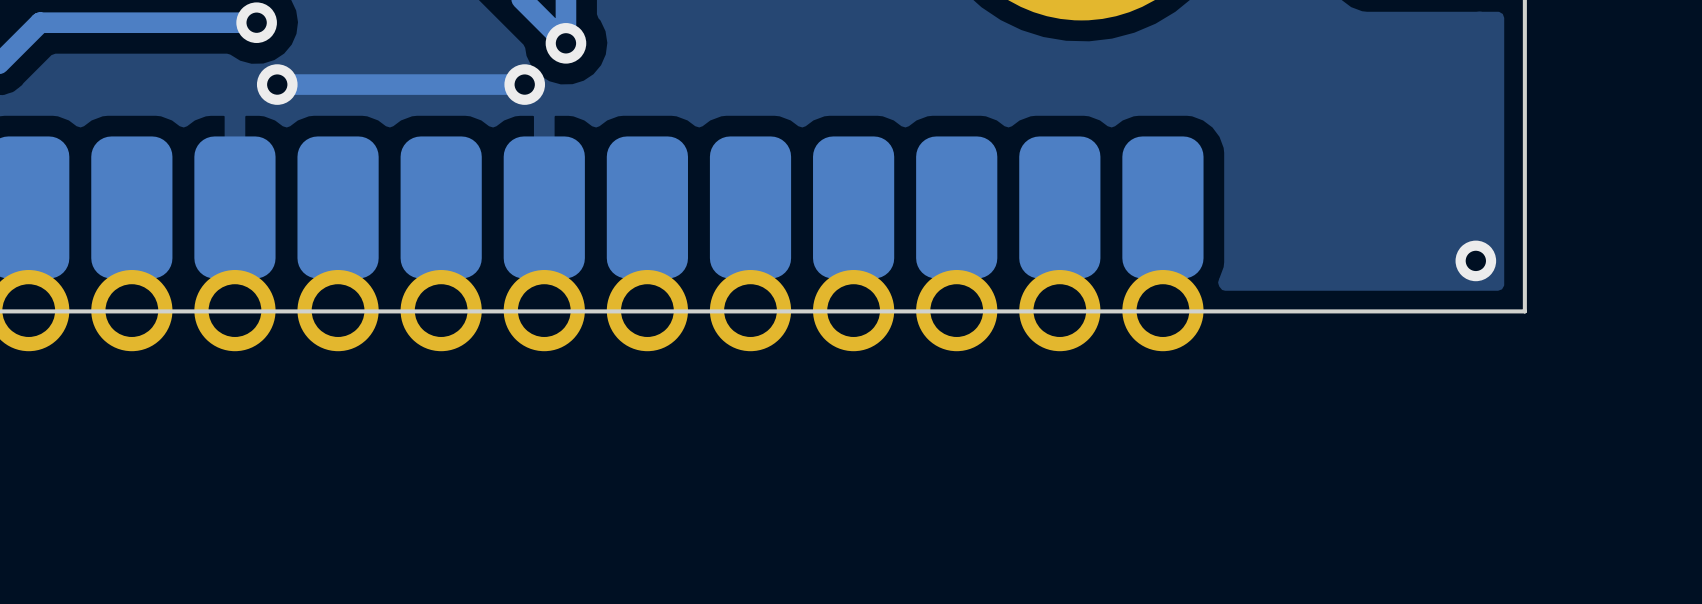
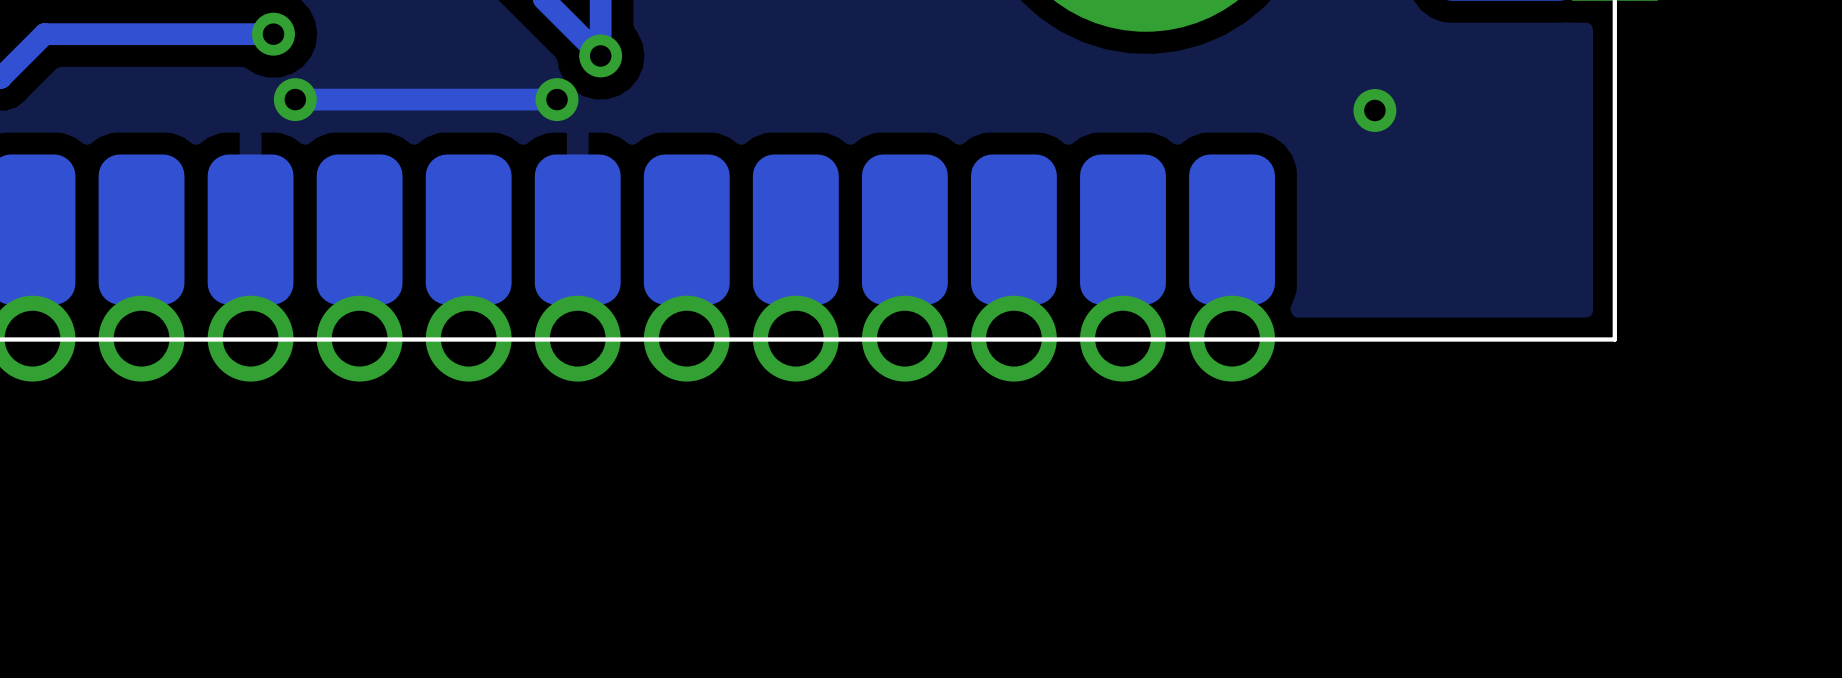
via position: (1475, 260) -> (1374, 110)

